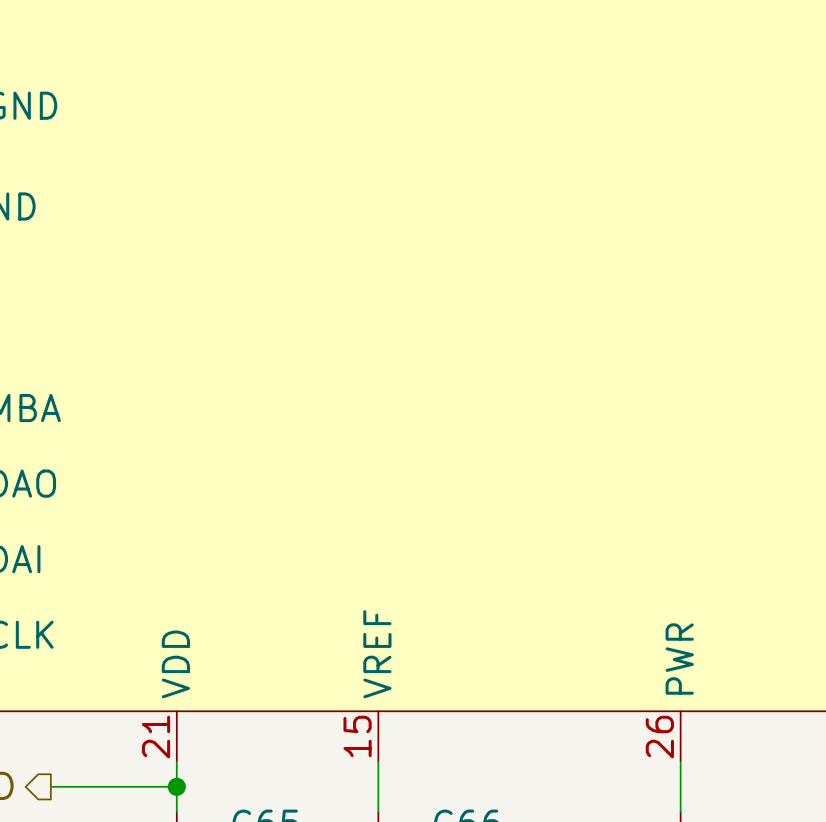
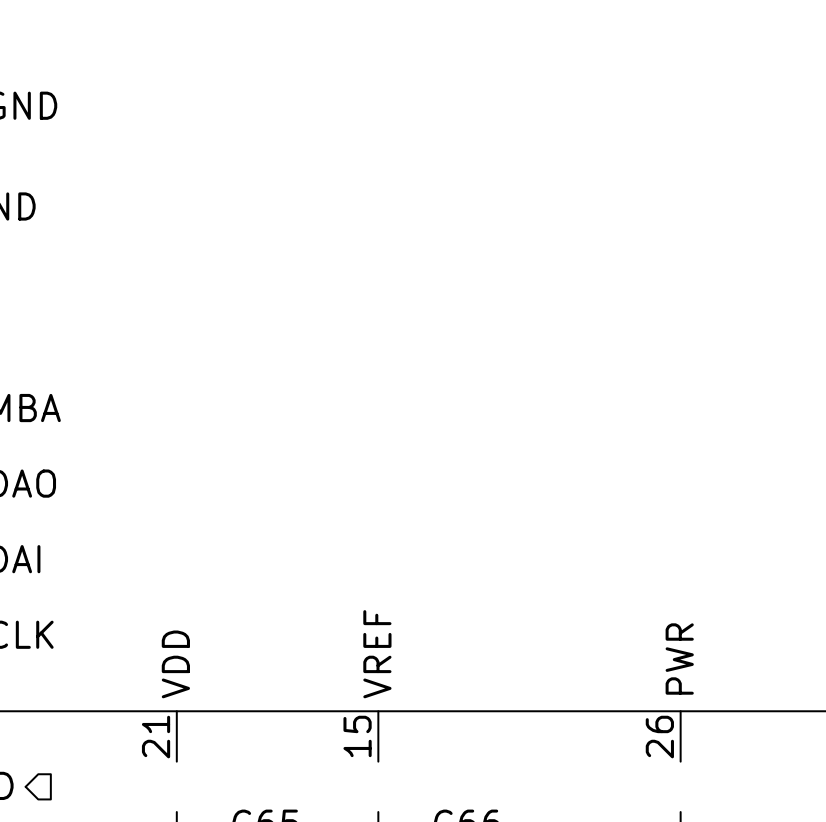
wire: (176, 761) (176, 812) -> none
wire: (378, 761) (378, 812) -> none
wire: (680, 761) (680, 812) -> none
wire: (50, 786) (176, 786) -> none
junction: (176, 786) -> none

